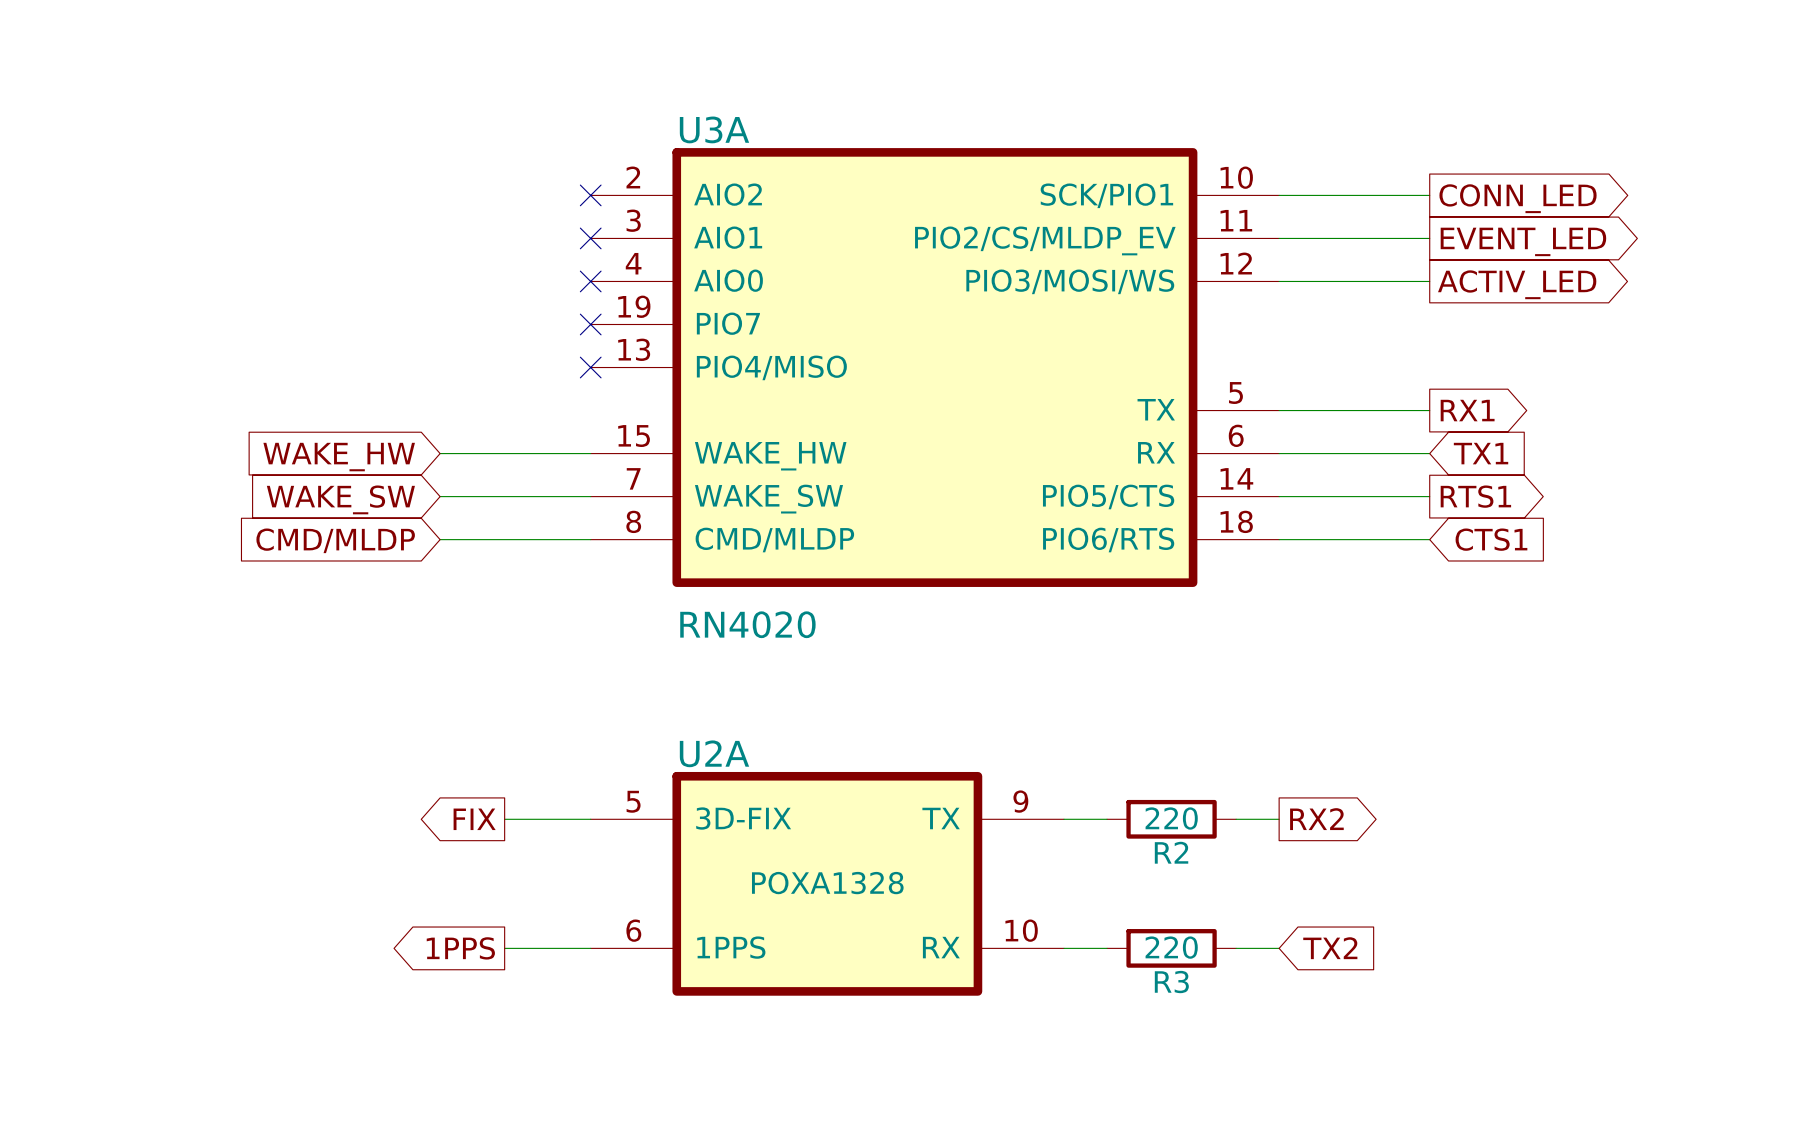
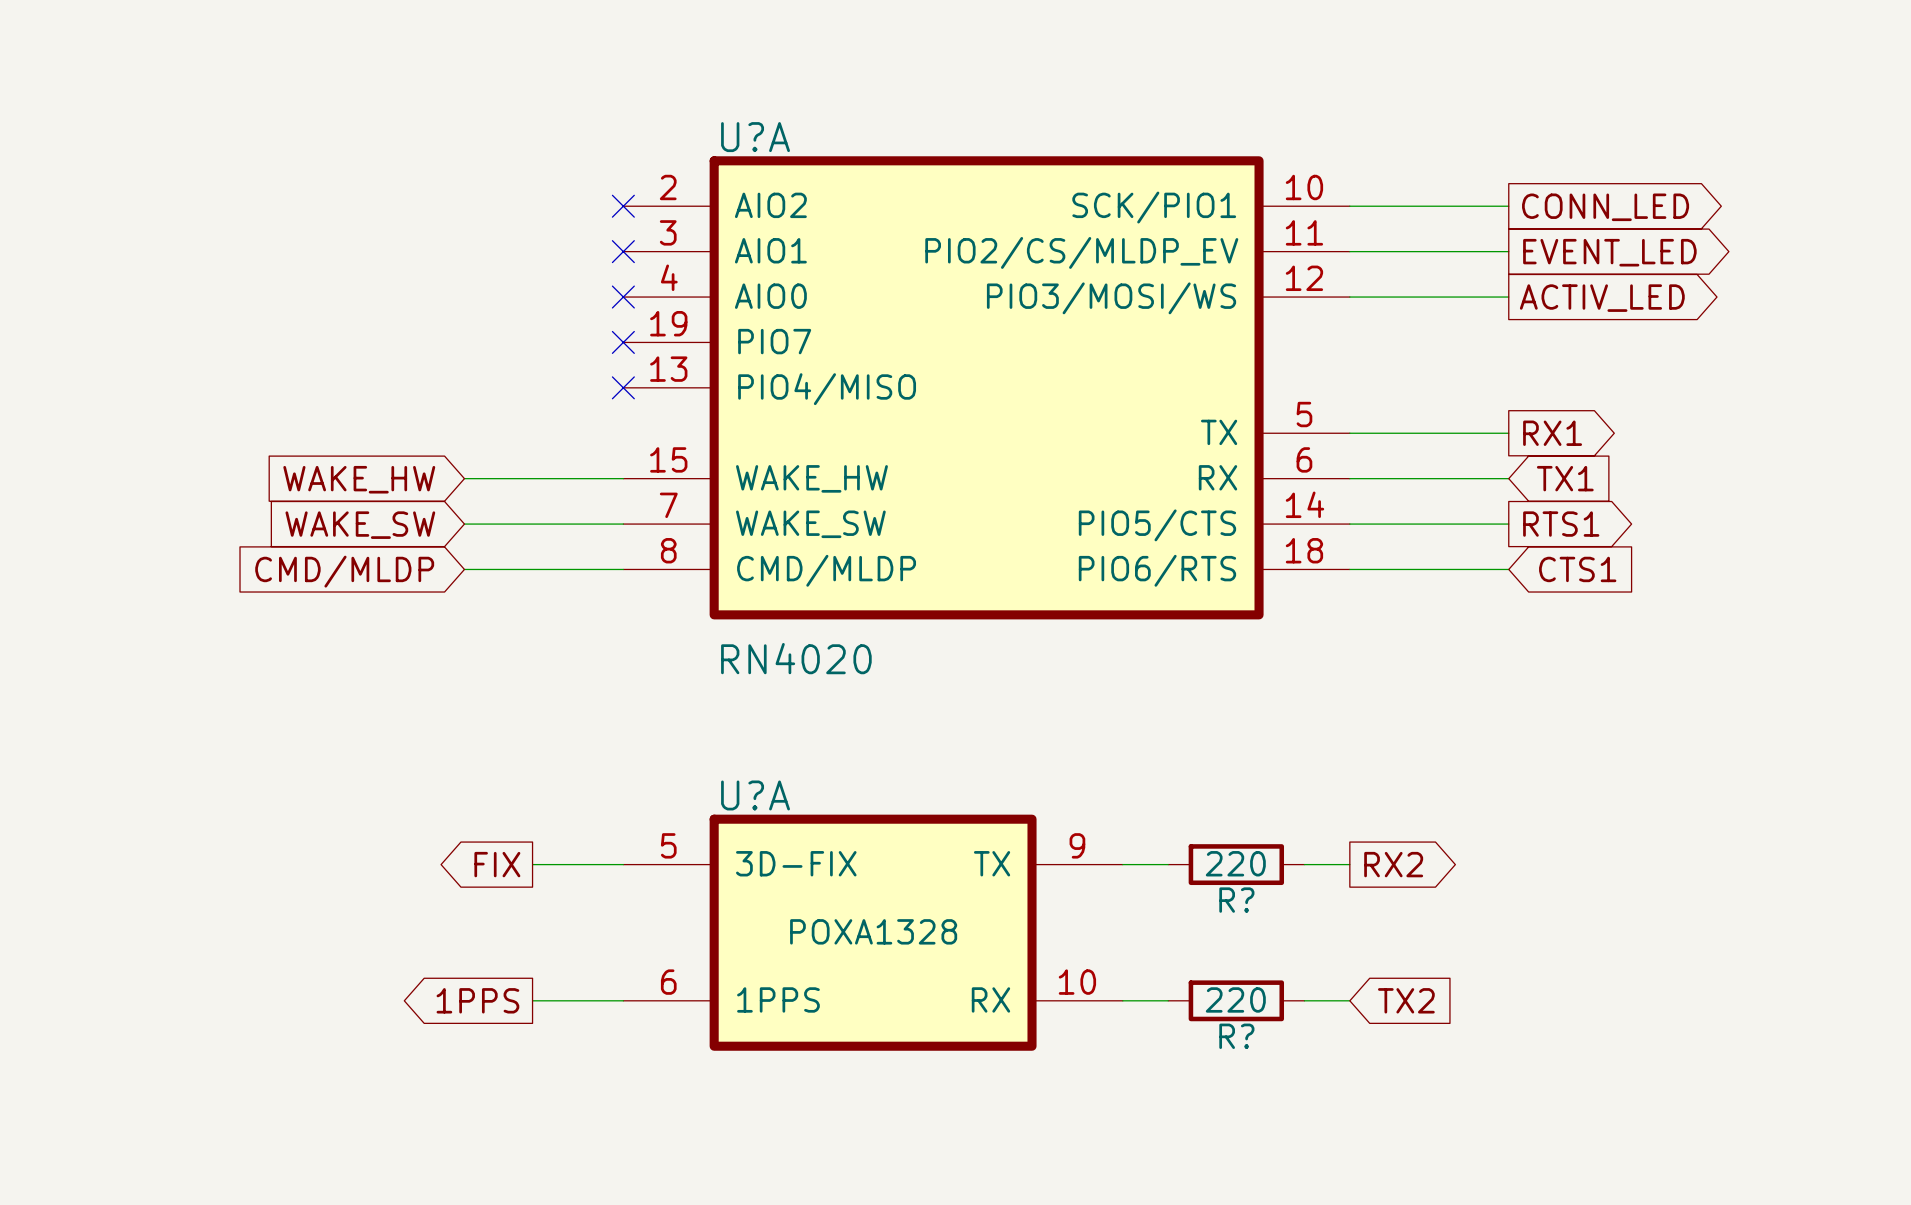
U3A name: U3A (714, 129) -> U?A (755, 137)
U2A name: U2A (714, 753) -> U?A (755, 795)
R2 name: R2 (1171, 852) -> R? (1236, 900)
R3 name: R3 (1171, 982) -> R? (1236, 1036)

